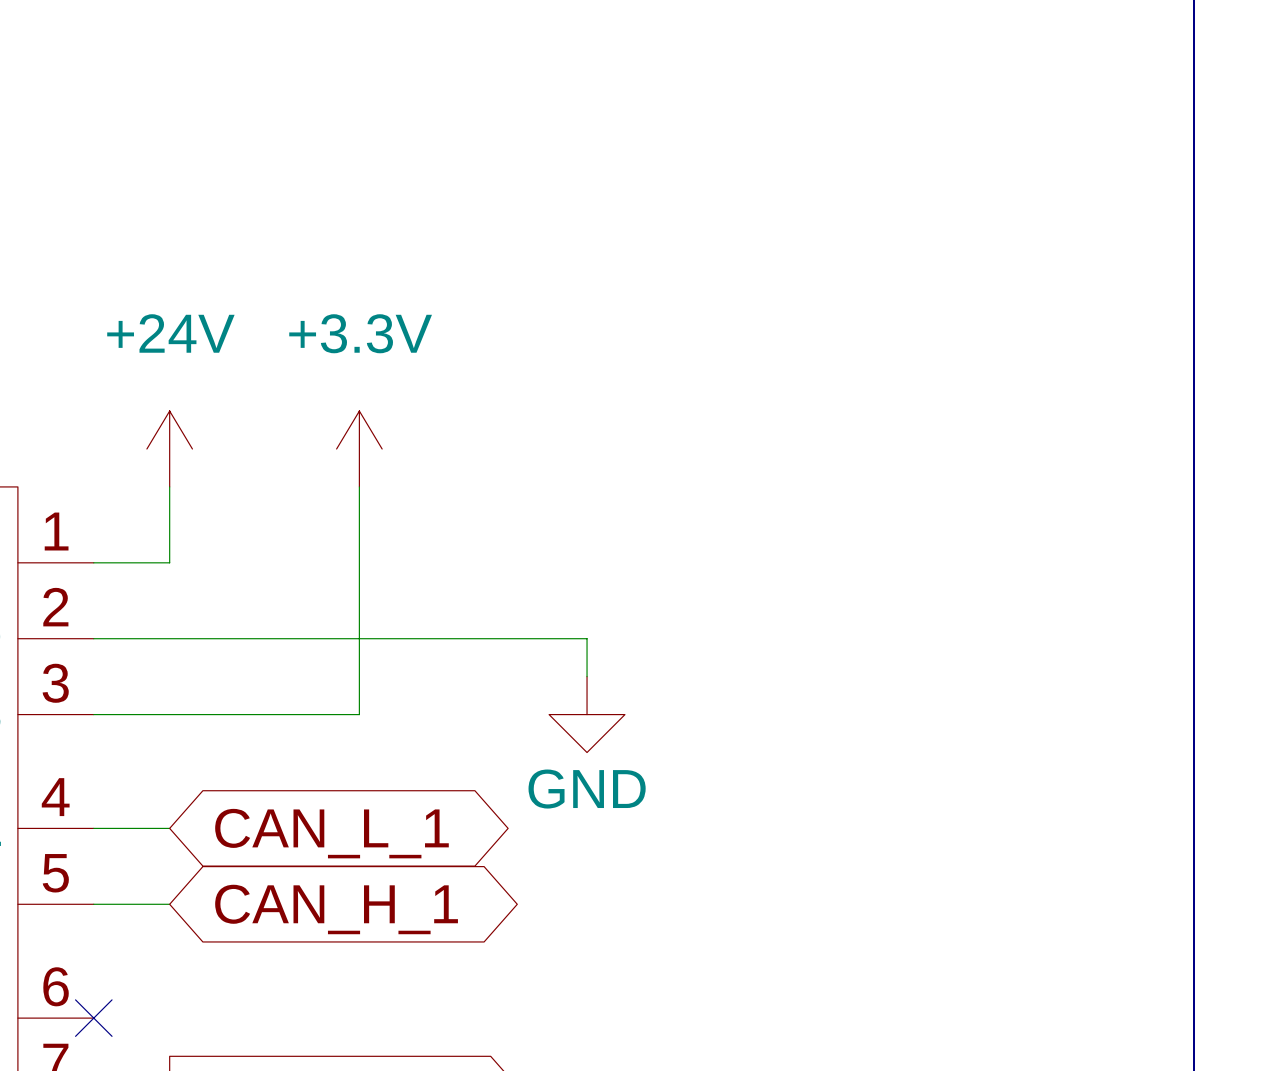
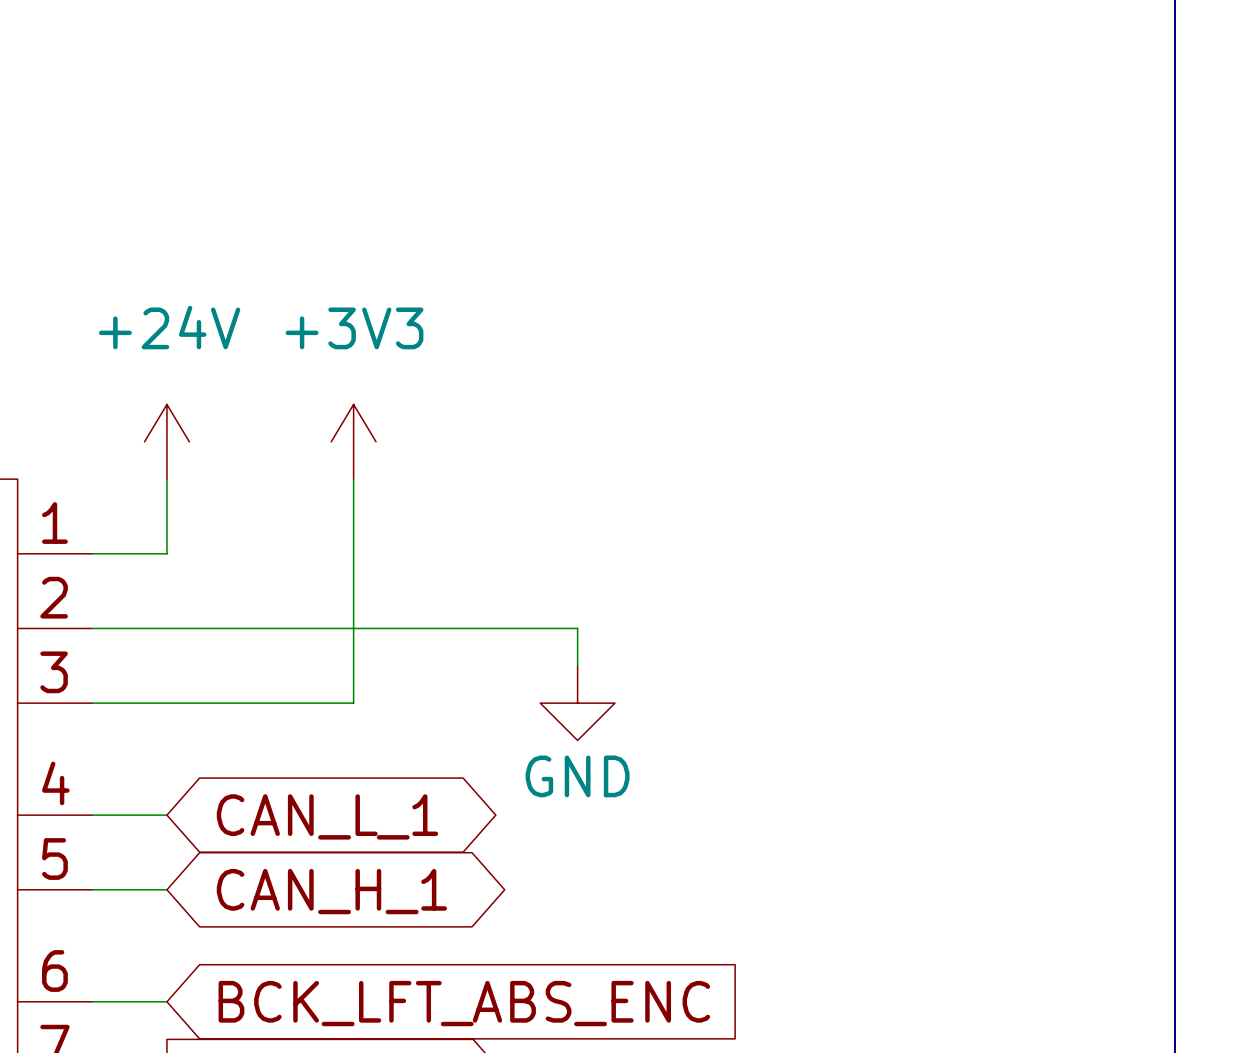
power symbol: +3.3V (359, 449) -> +3V3 (353, 441)
wire: none -> (92, 1001) (166, 1001)
no-connect mark: (93, 1018) -> none
global label: none -> BCK_LFT_ABS_ENC (464, 1003)

